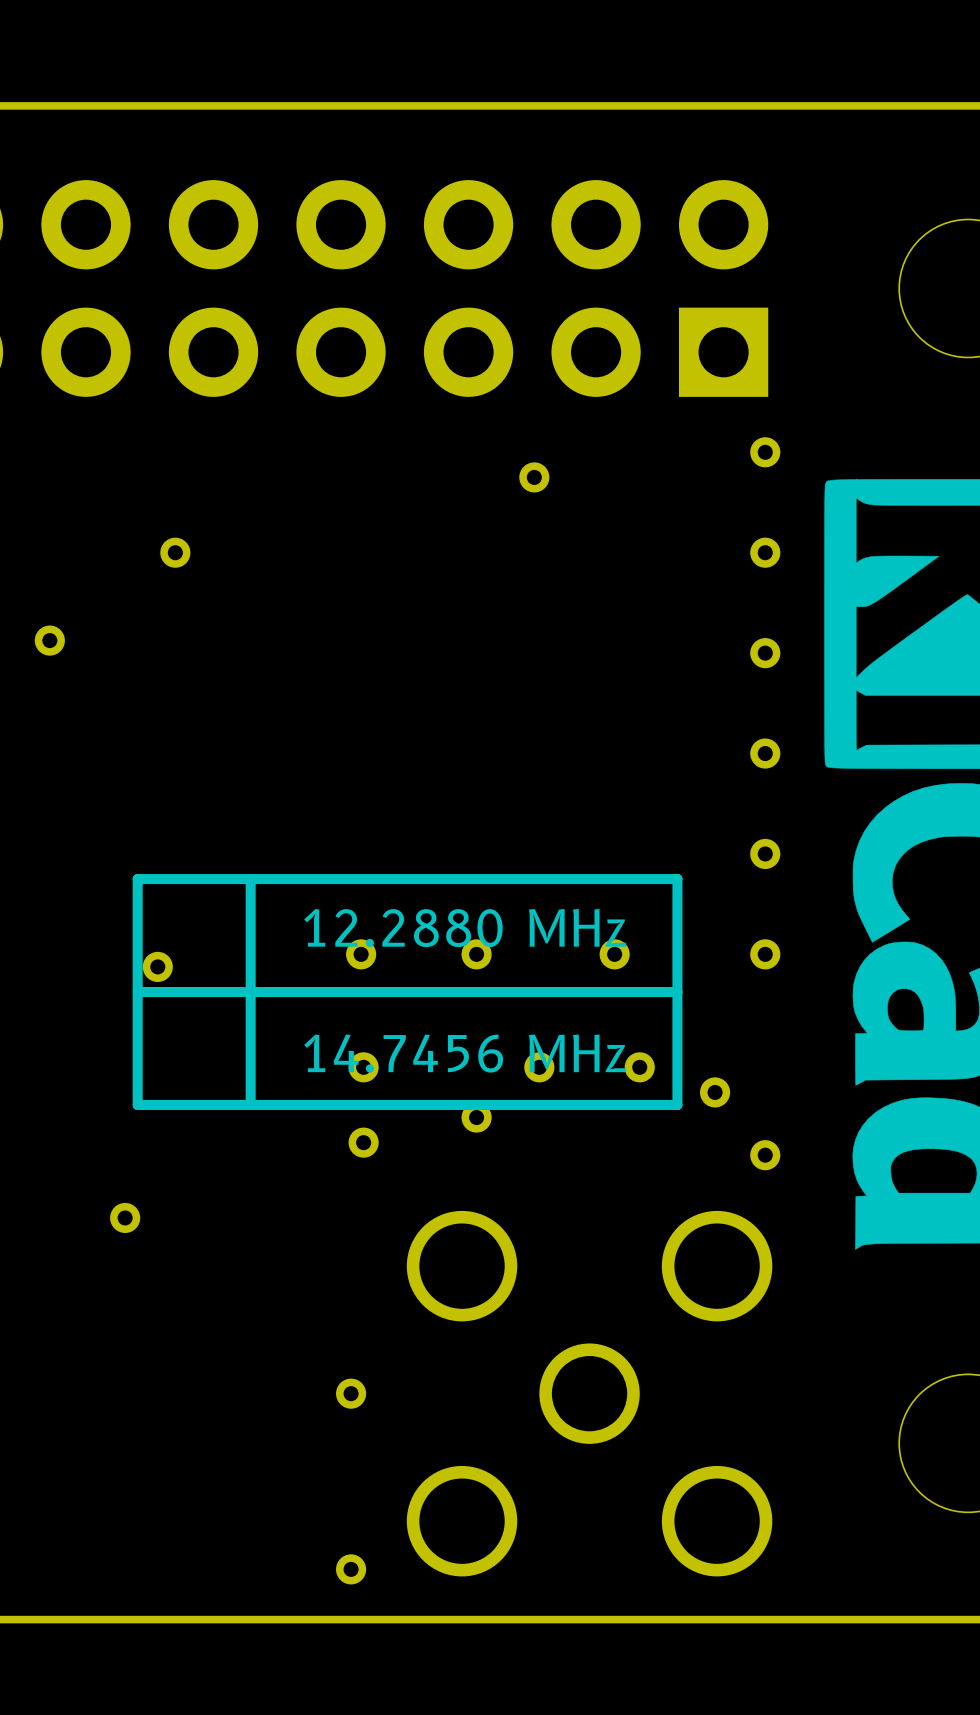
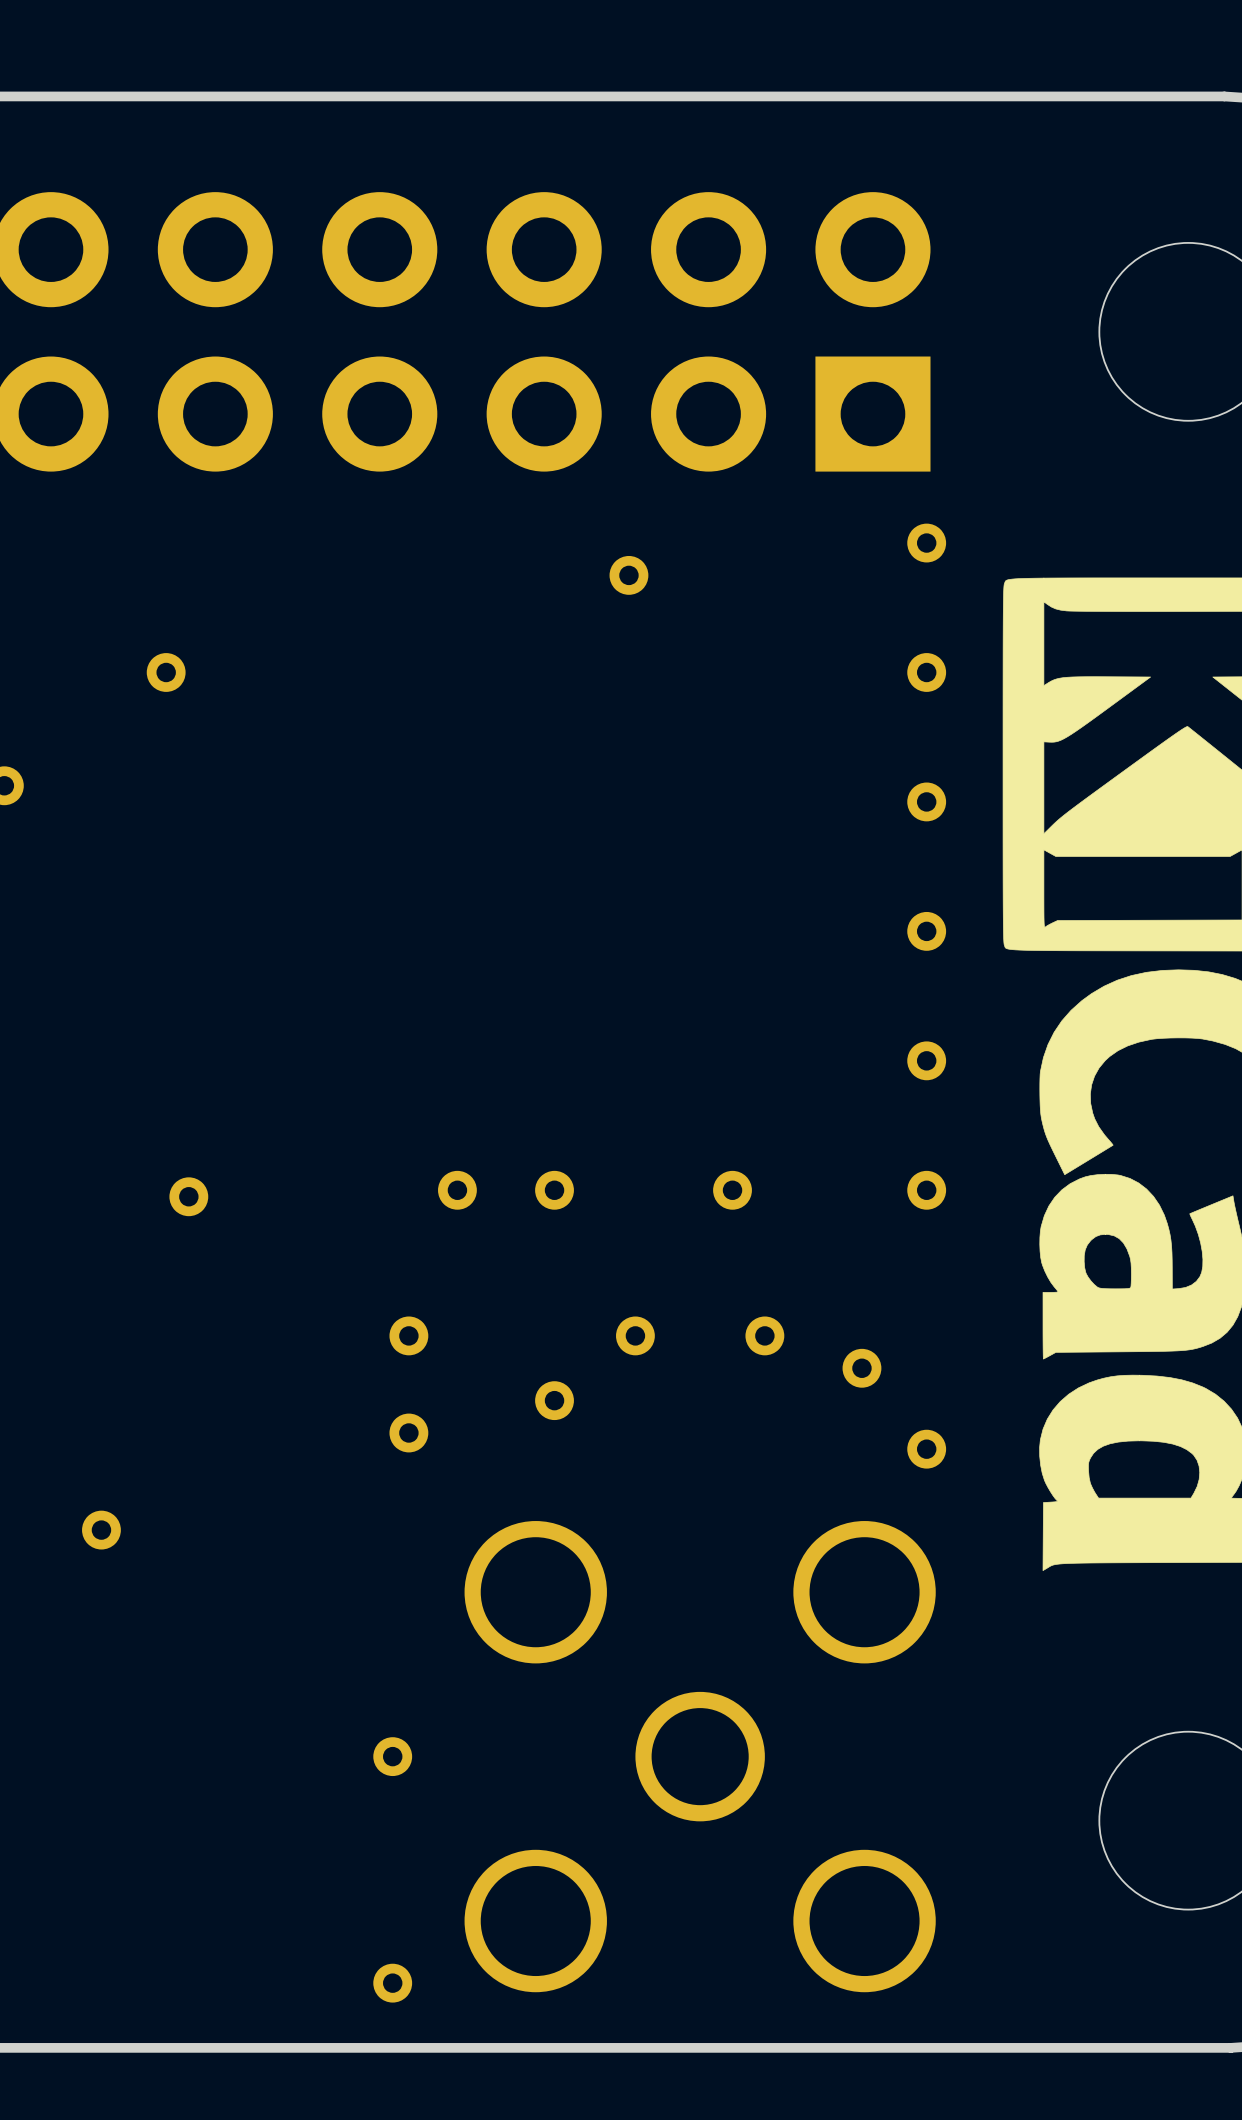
line: (250, 879) (250, 1104) -> none
line: (677, 879) (137, 879) (137, 1104) (677, 1104) (677, 879) -> none
text: 12.2880 MHz (465, 928) -> none
part position: (361, 954) -> (457, 1190)
part position: (157, 966) -> (188, 1196)
line: (677, 992) (137, 992) -> none
text: 14.7456 MHz (465, 1053) -> none

